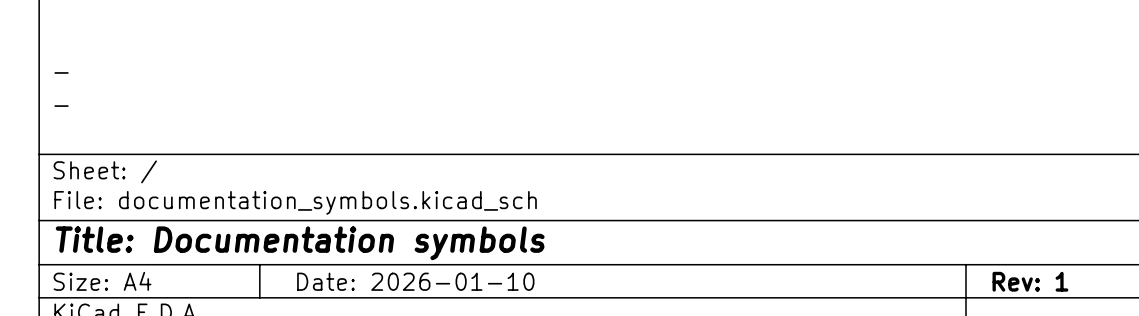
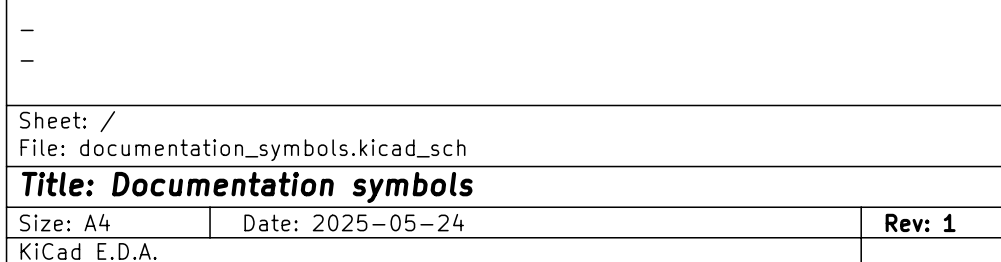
title block: Date: 2026-01-10 (415, 281) -> Date: 2025-05-24 (354, 222)

